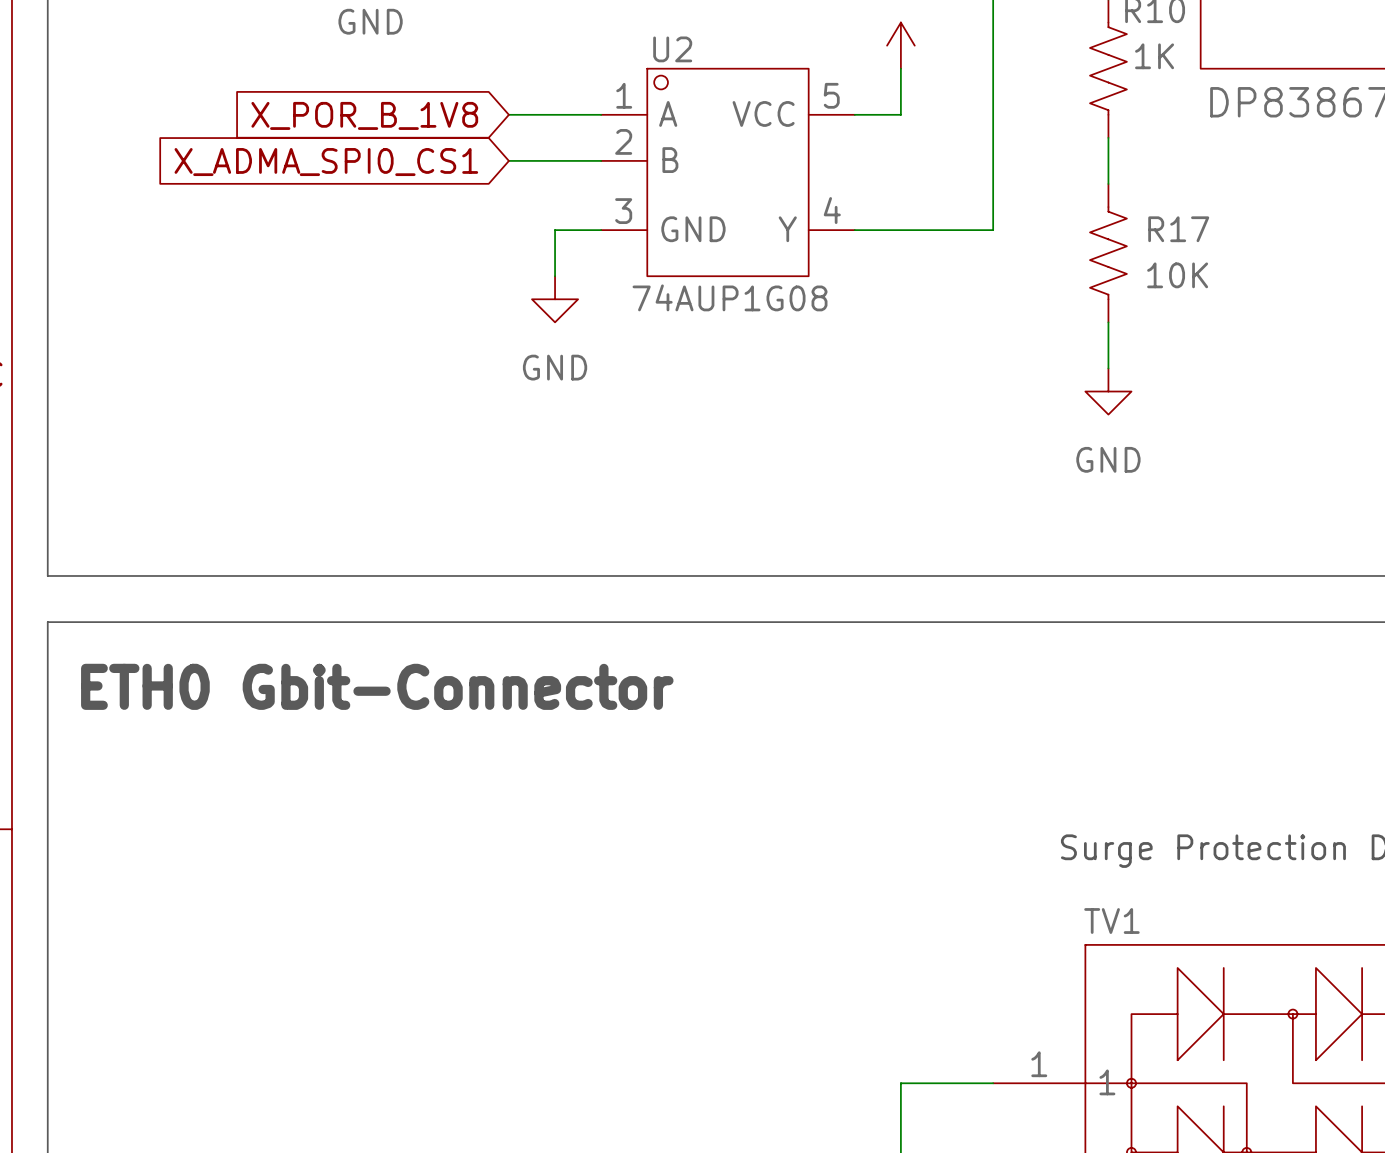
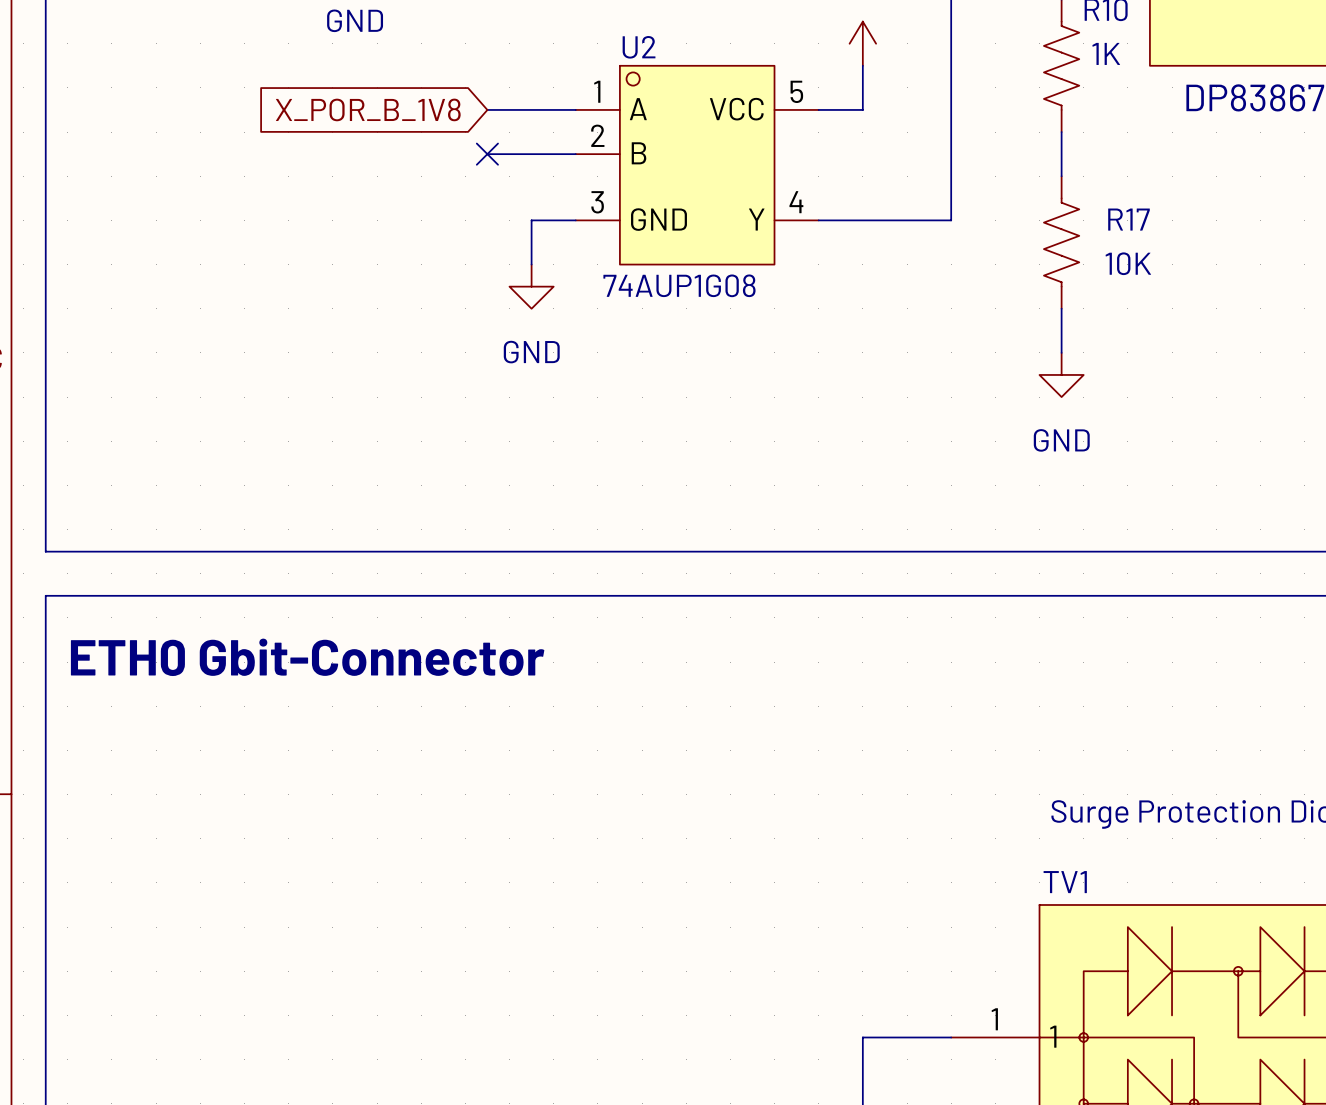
no-connect mark: none -> (487, 154)
global label: X_ADMA_SPI0_CS1 (326, 162) -> none

